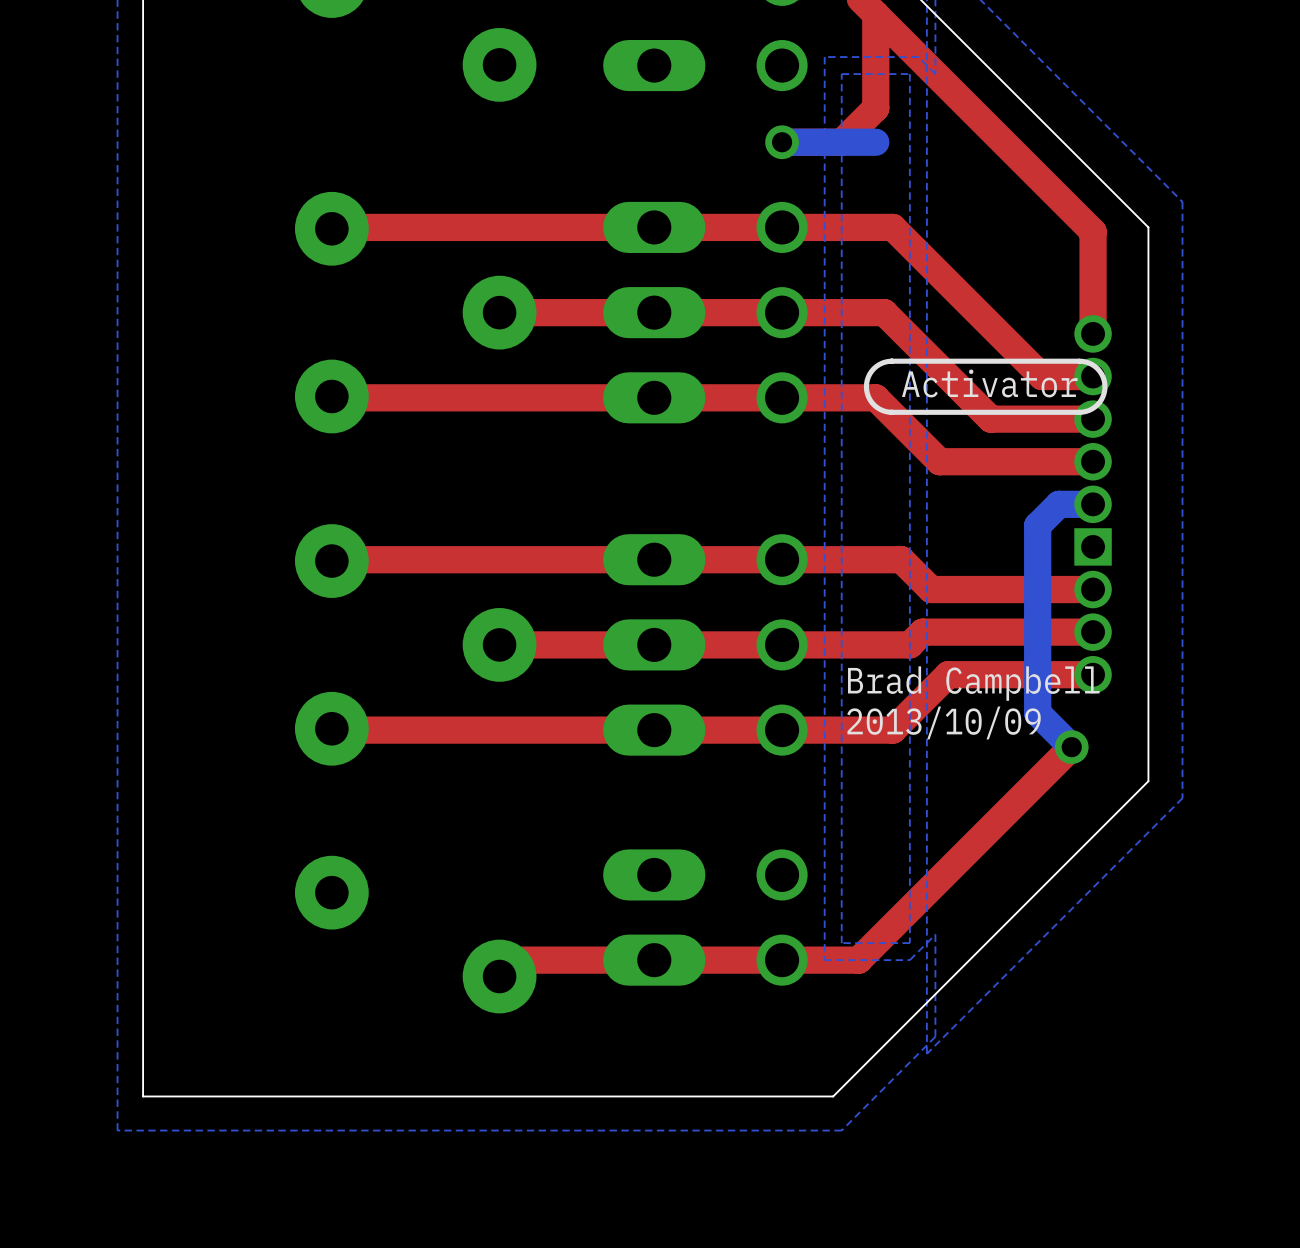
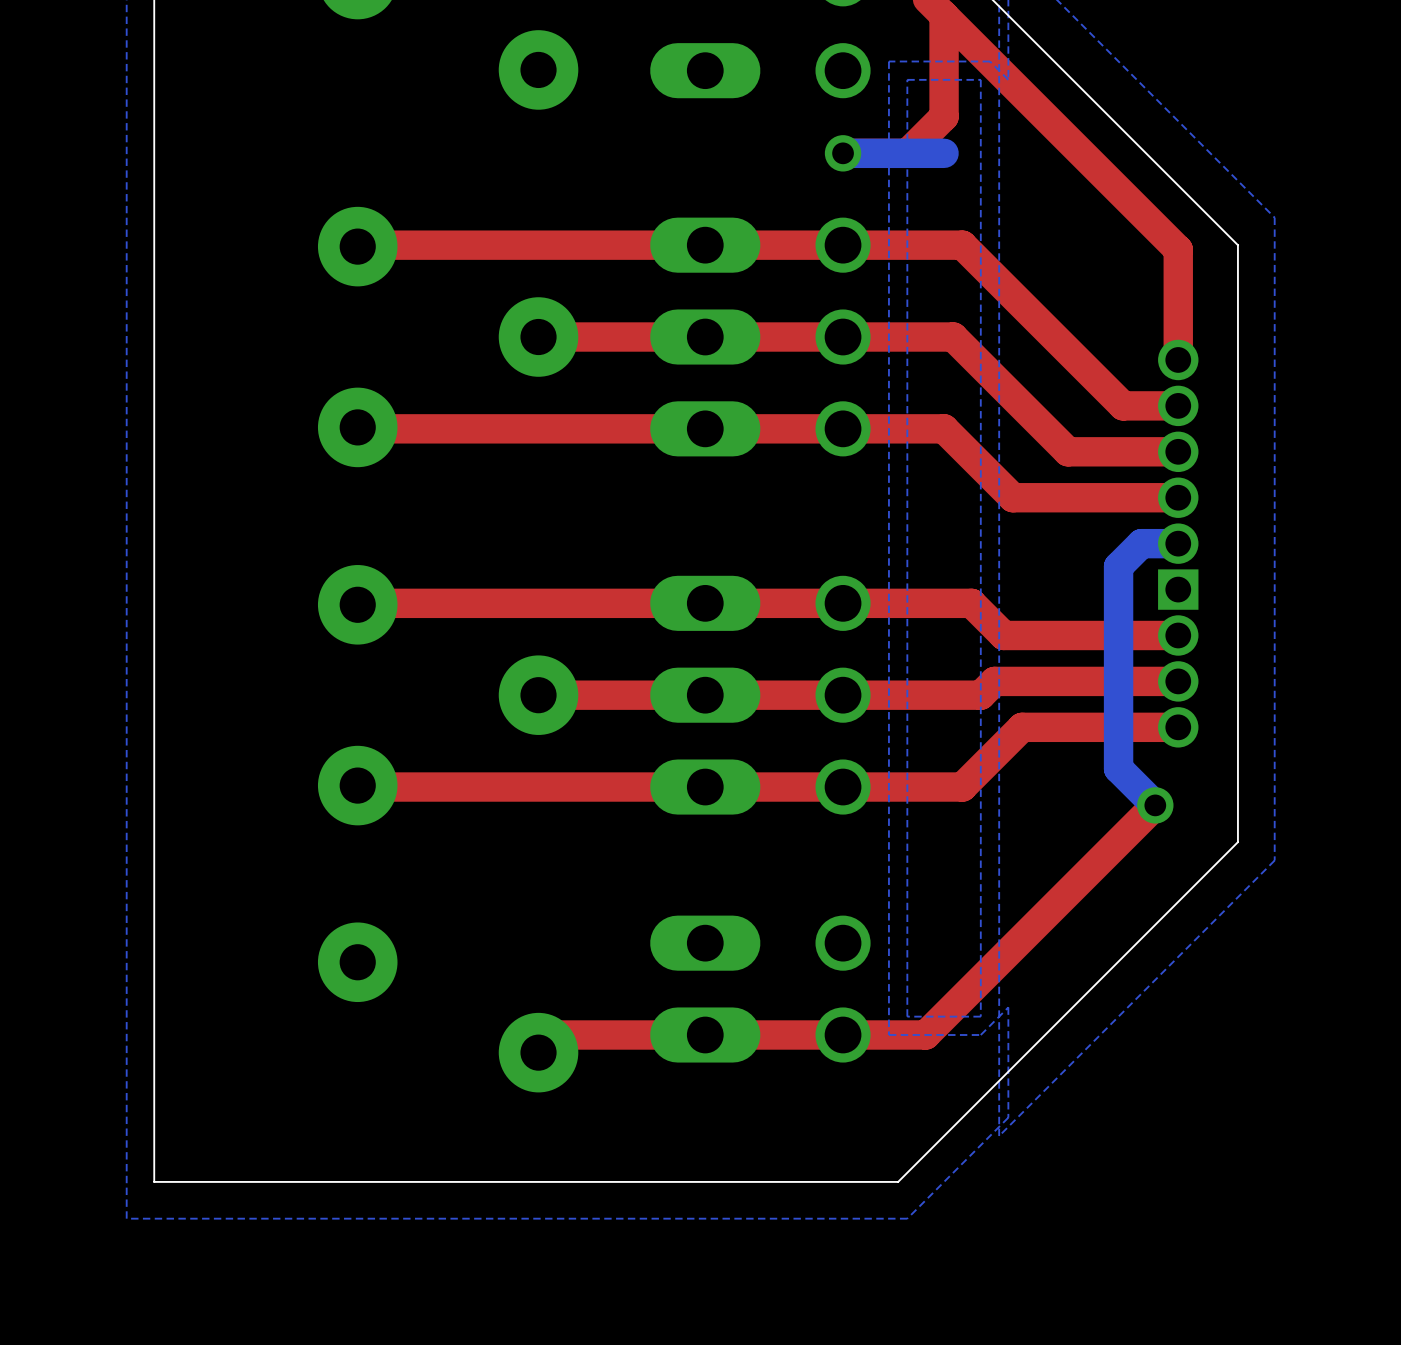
line: (891, 361) (882, 363) (873, 368) (868, 376) (866, 386) (868, 396) (873, 404) (882, 410) (891, 412) -> none
line: (891, 361) (1082, 361) (1092, 364) (1099, 371) (1104, 386) (1099, 402) (1092, 408) (1082, 412) (891, 412) -> none
text: Activator (989, 383) -> none
text: Brad Campbell (973, 683) -> none
text: 2013/10/09 (944, 722) -> none

